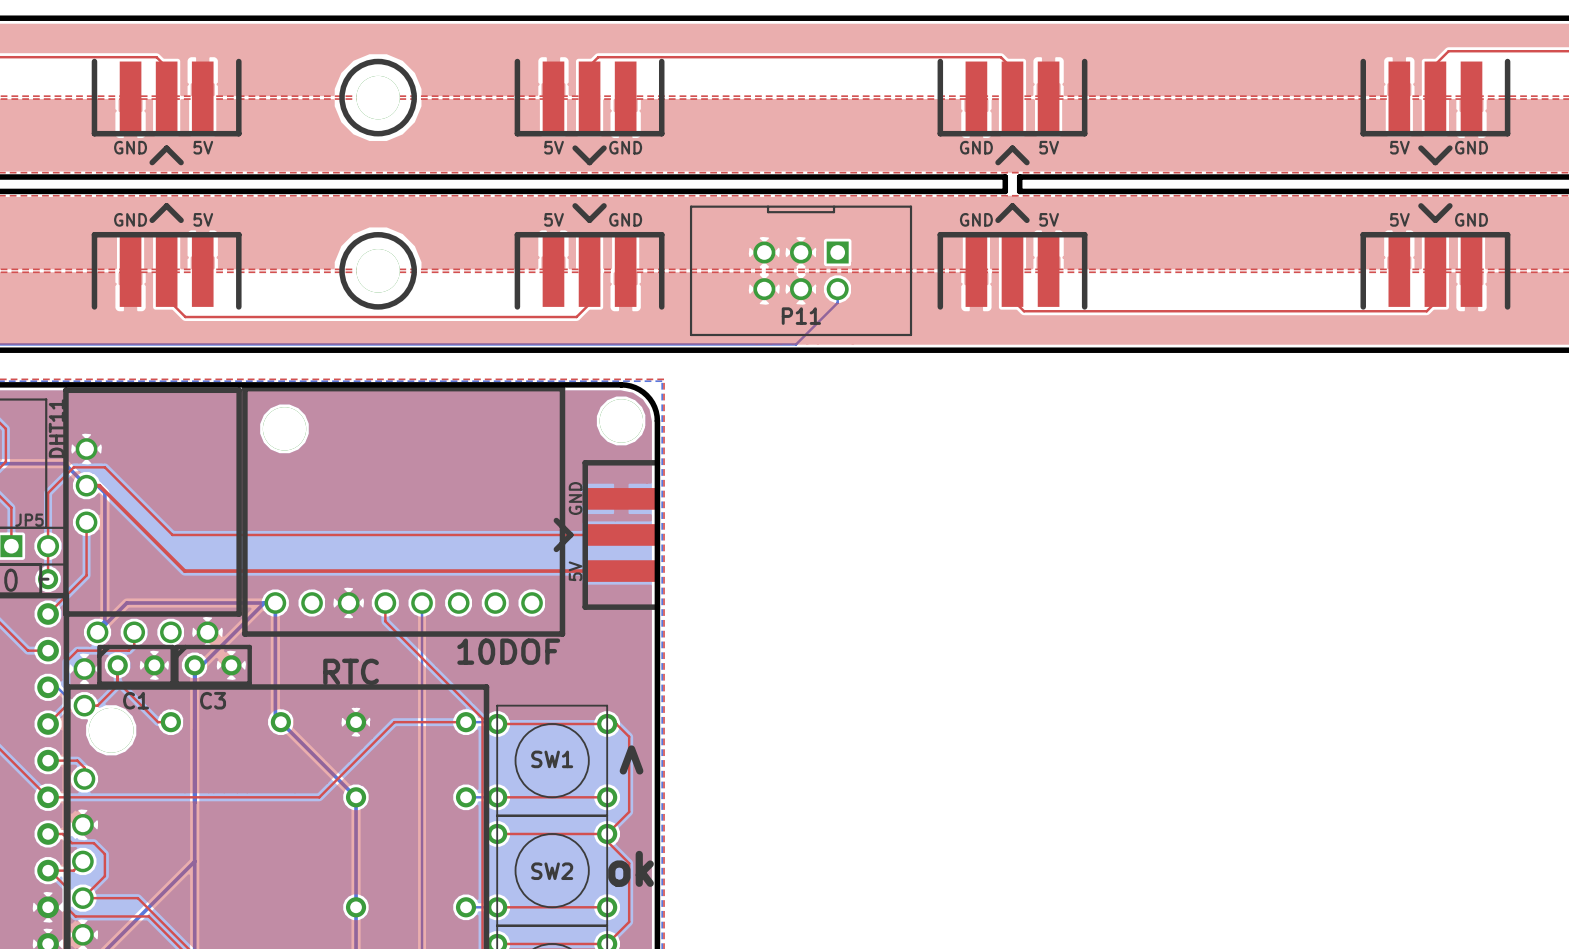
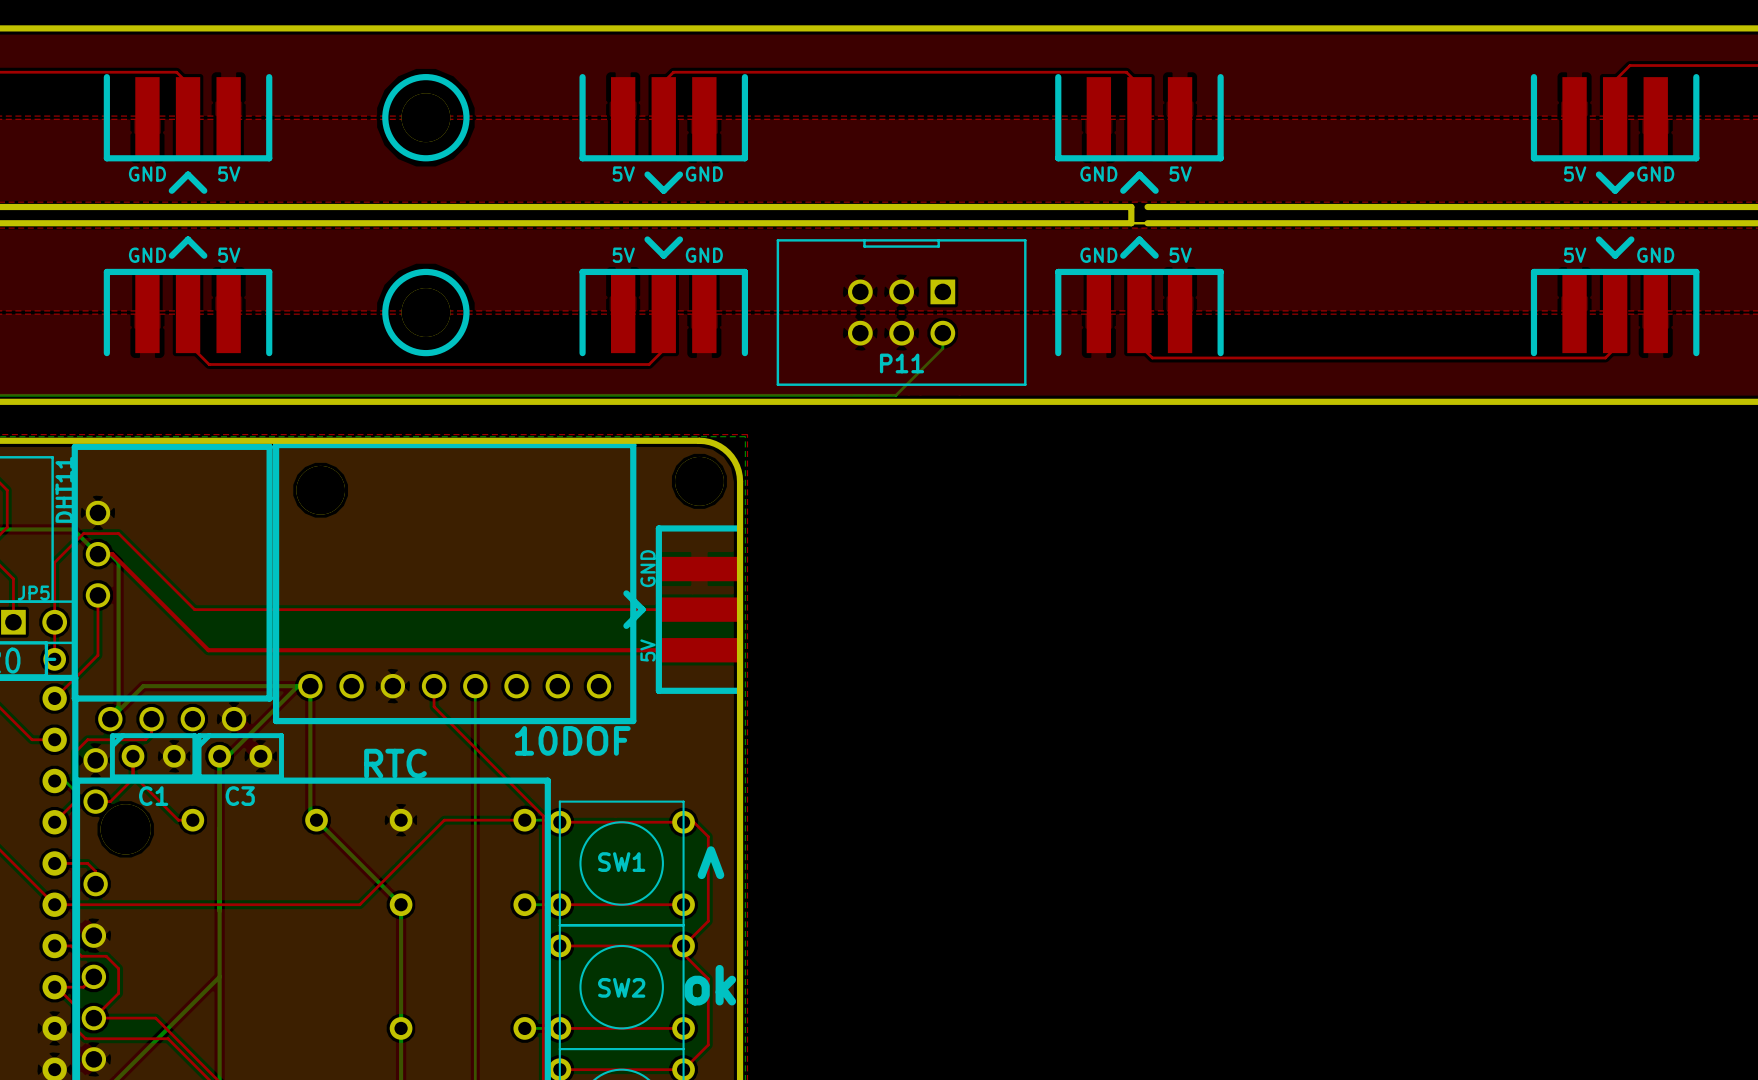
board edge: (1019, 177) (1019, 191) -> (1131, 223) (1147, 223)

